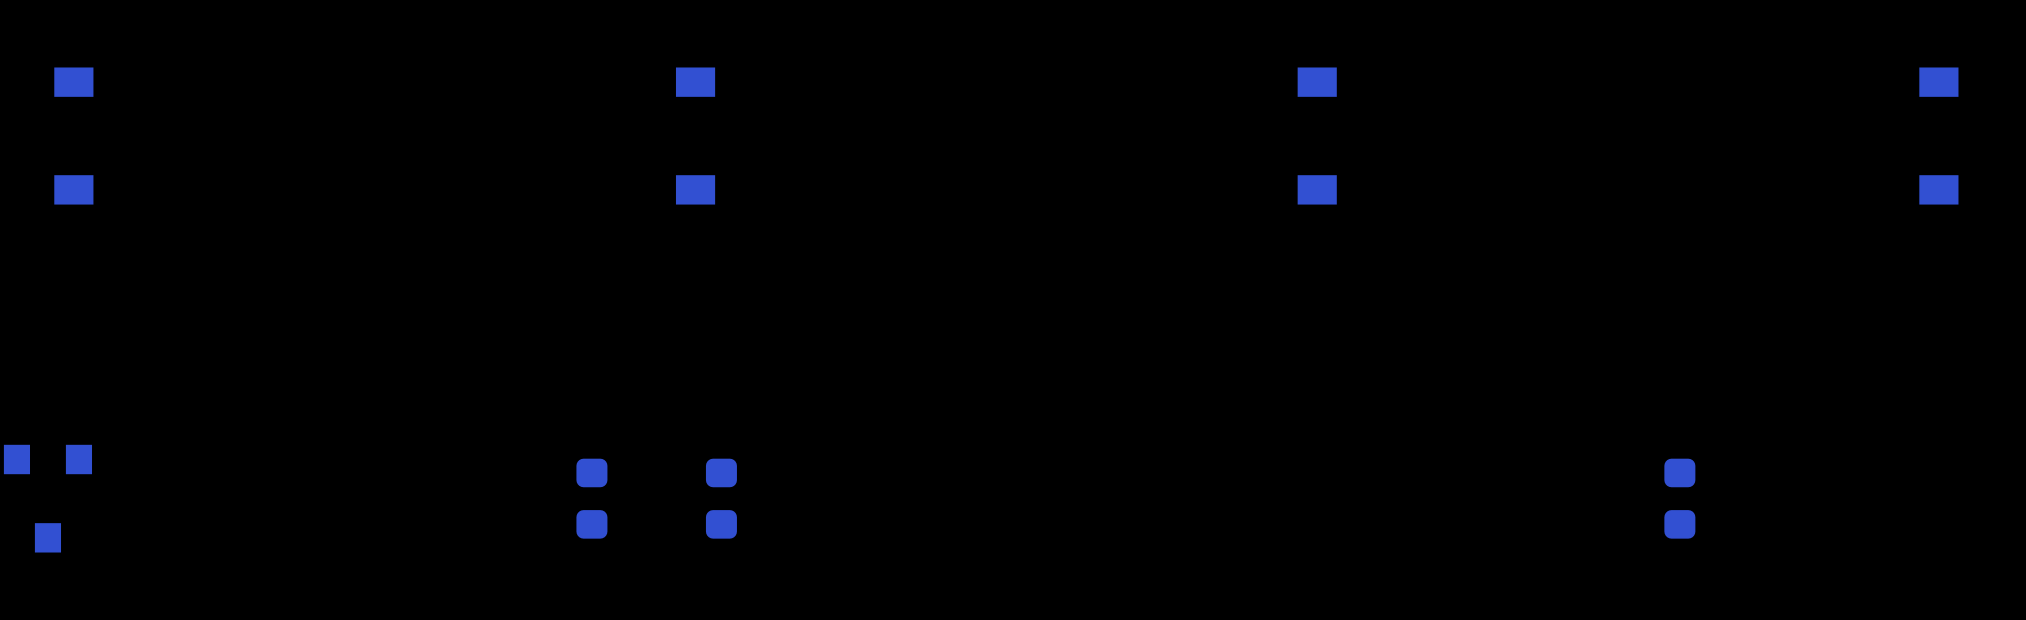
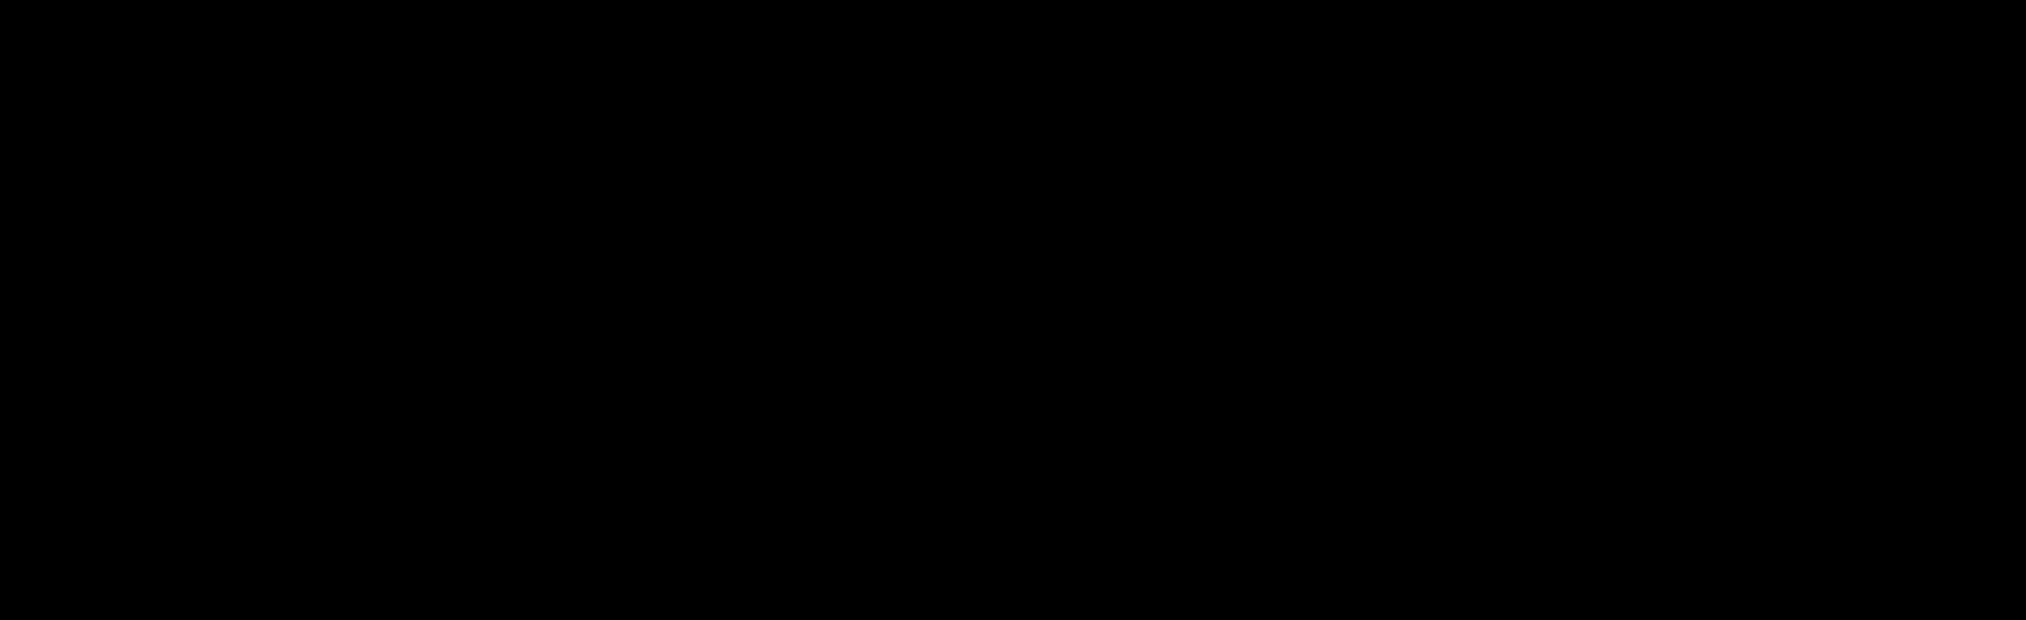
part: (73, 136) -> none
part: (695, 136) -> none
part: (1317, 136) -> none
part: (1938, 136) -> none
part: (47, 498) -> none
part: (591, 498) -> none
part: (721, 498) -> none
part: (1679, 498) -> none

